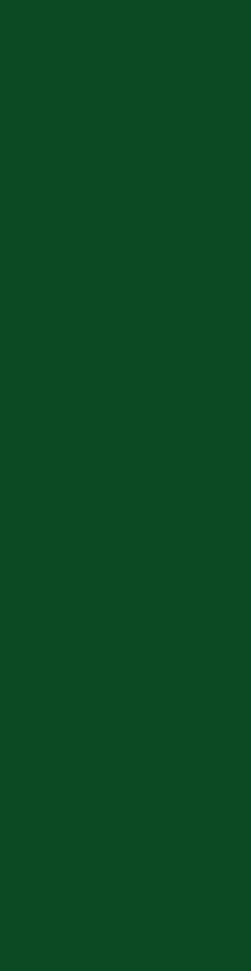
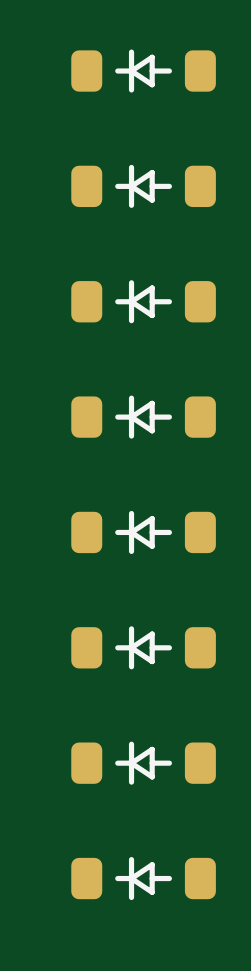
part: none -> (143, 71)
part: none -> (143, 186)
part: none -> (143, 301)
part: none -> (143, 417)
part: none -> (143, 532)
part: none -> (143, 647)
part: none -> (143, 763)
part: none -> (143, 878)

